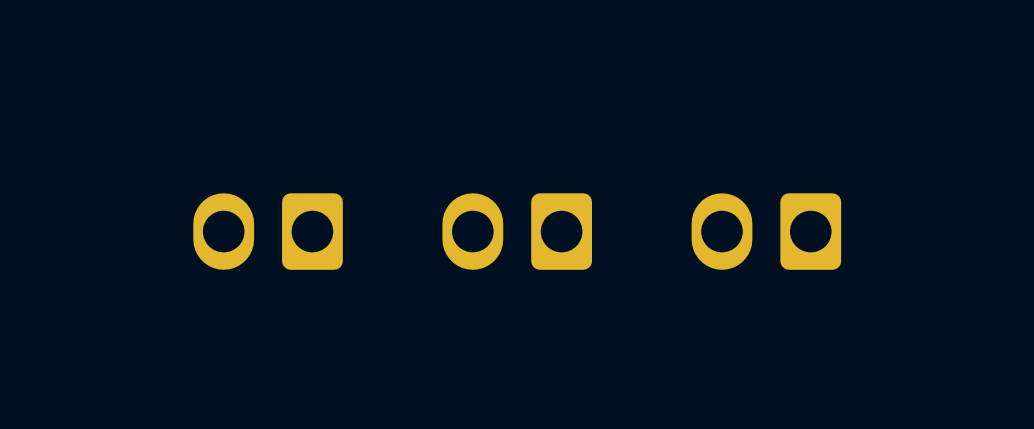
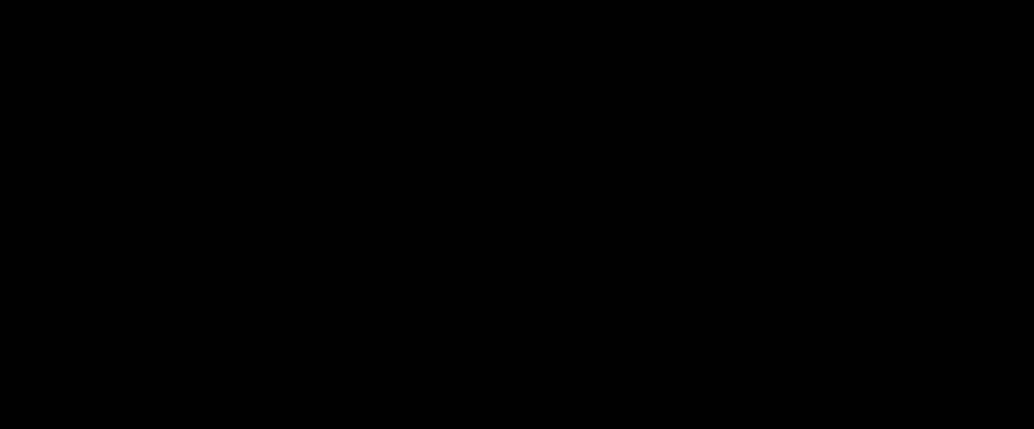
part: (268, 231) -> none
part: (517, 231) -> none
part: (766, 231) -> none

